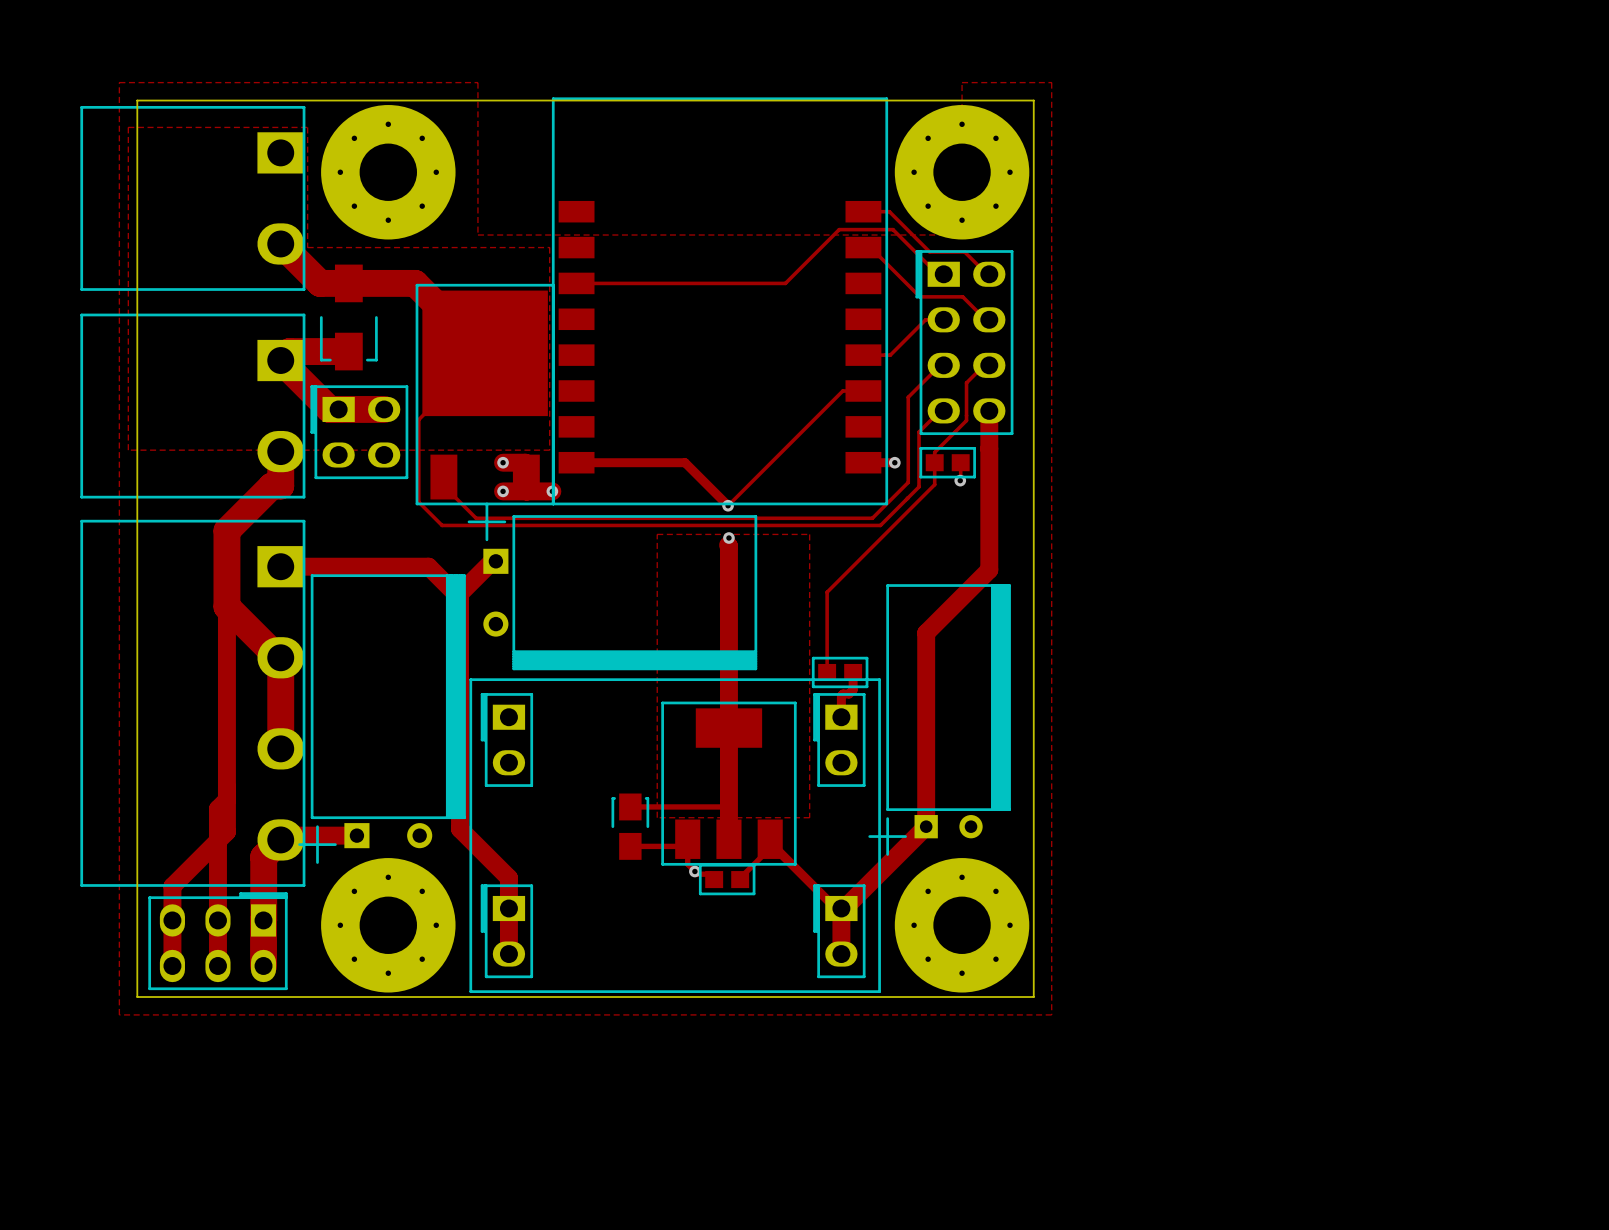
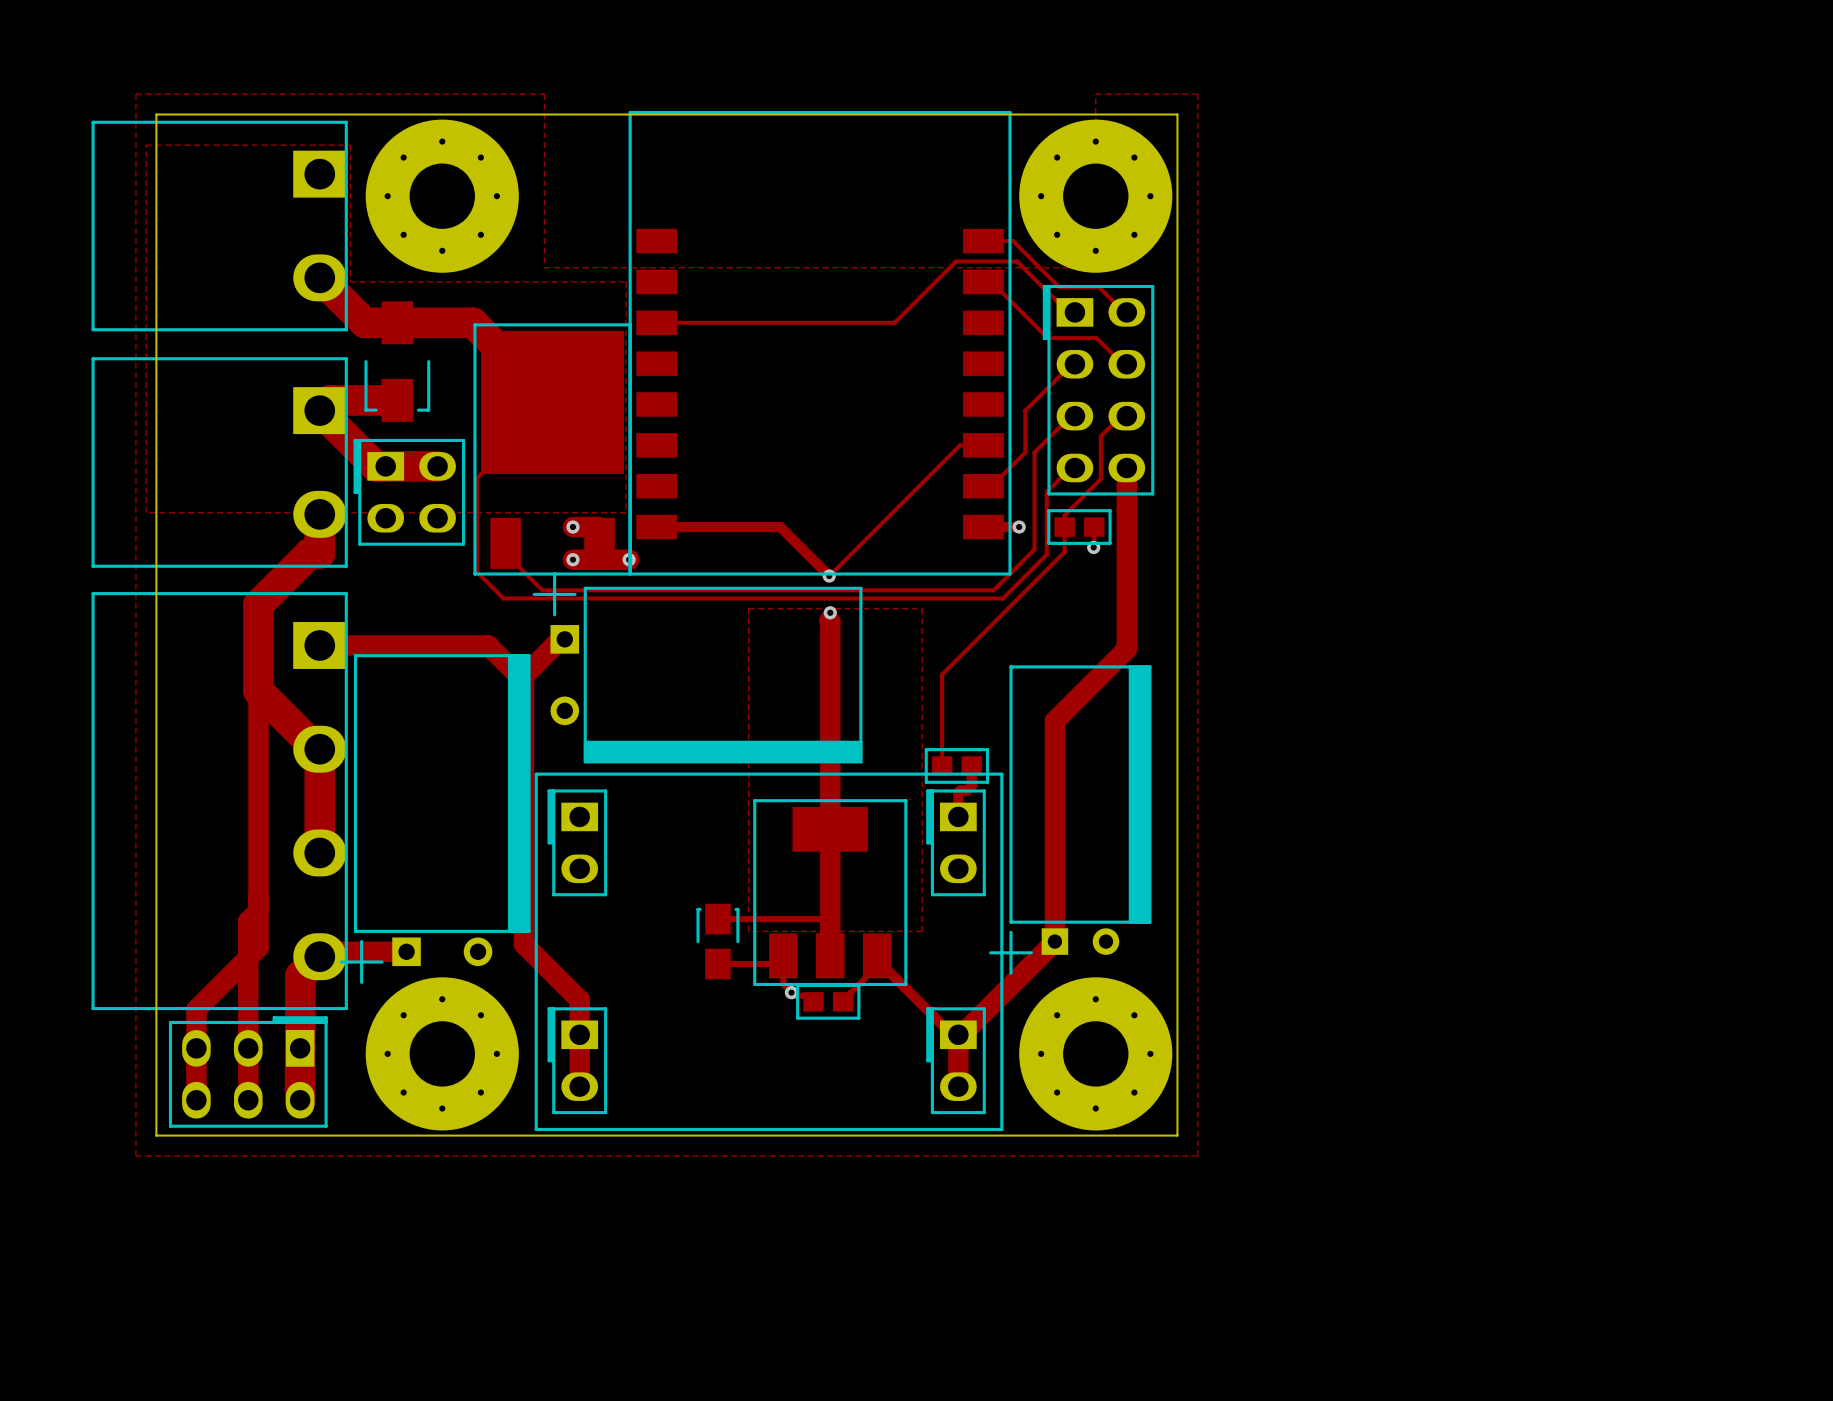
track: (940, 319) (925, 319) (890, 355) (863, 355) -> (1071, 364) (1025, 410) (1025, 452) (991, 486)

